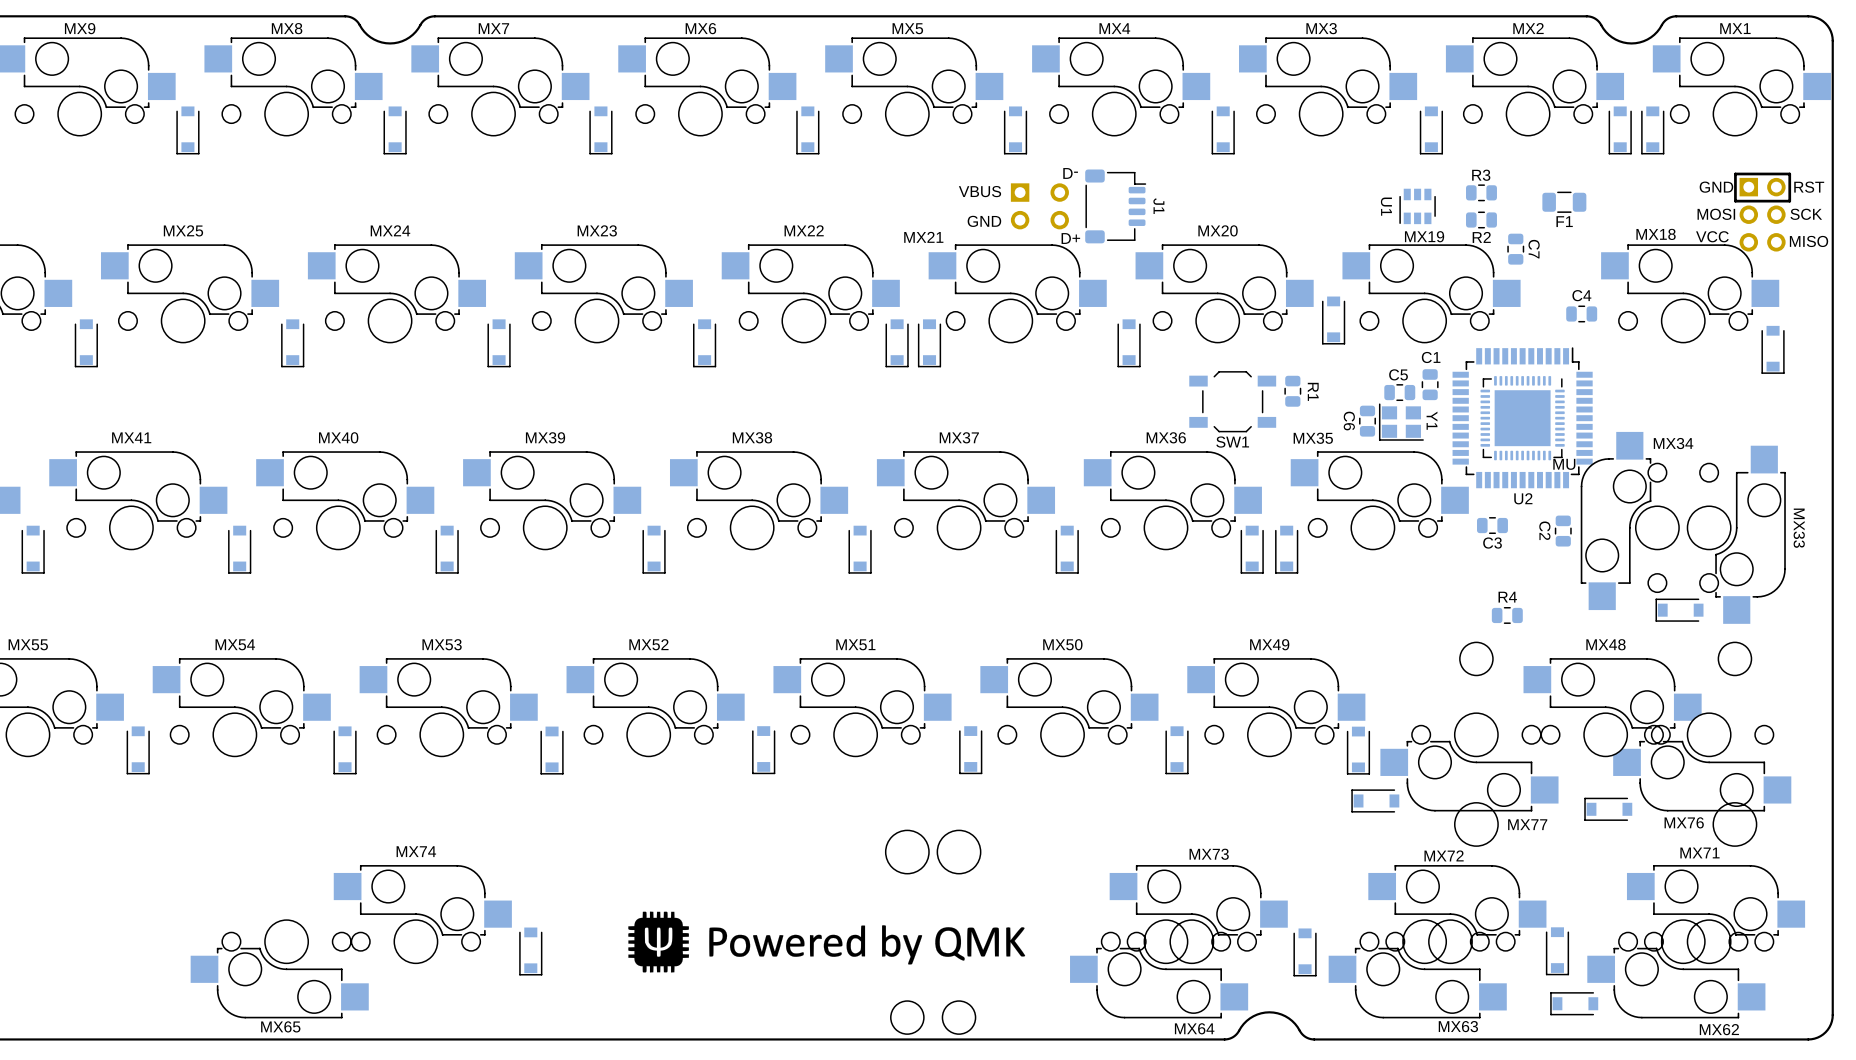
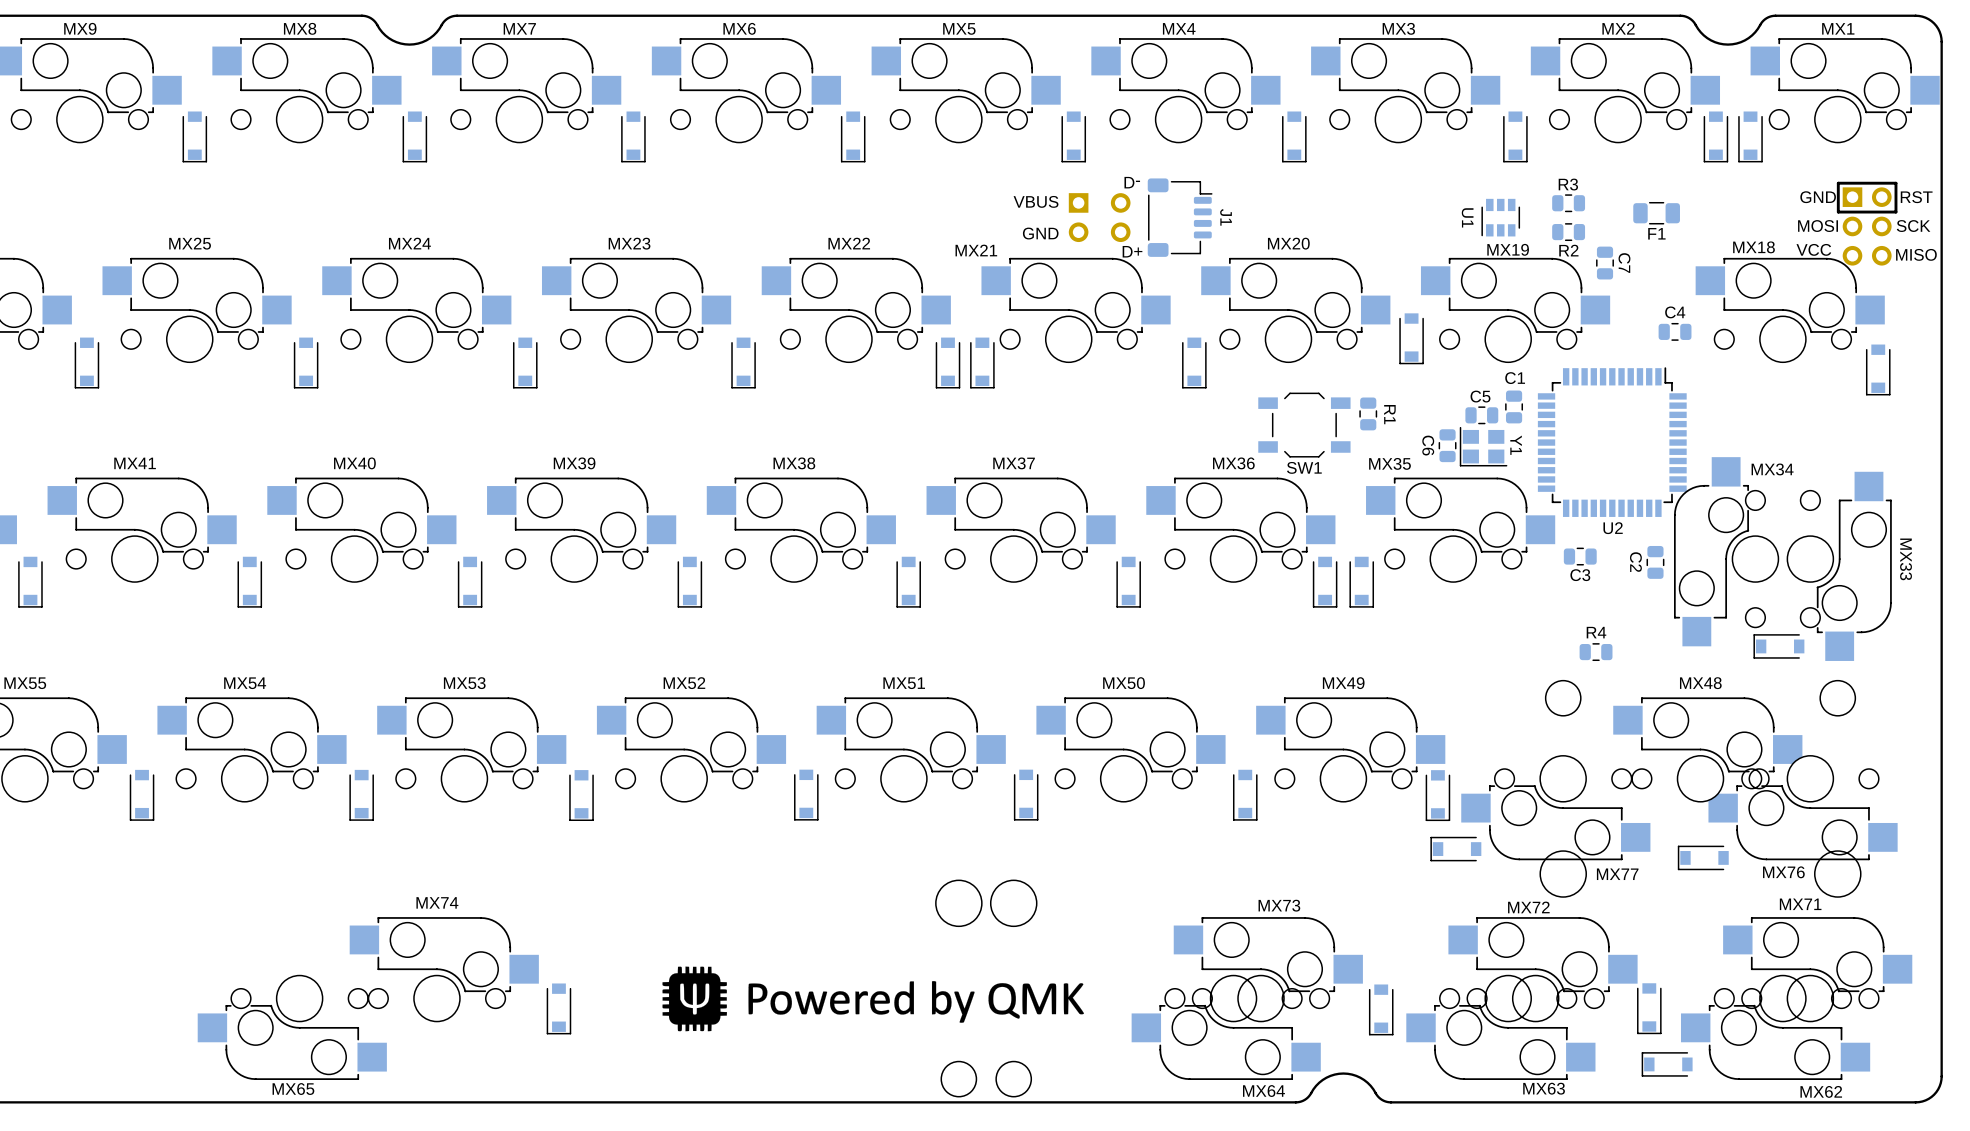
MU: (1522, 418) -> none

